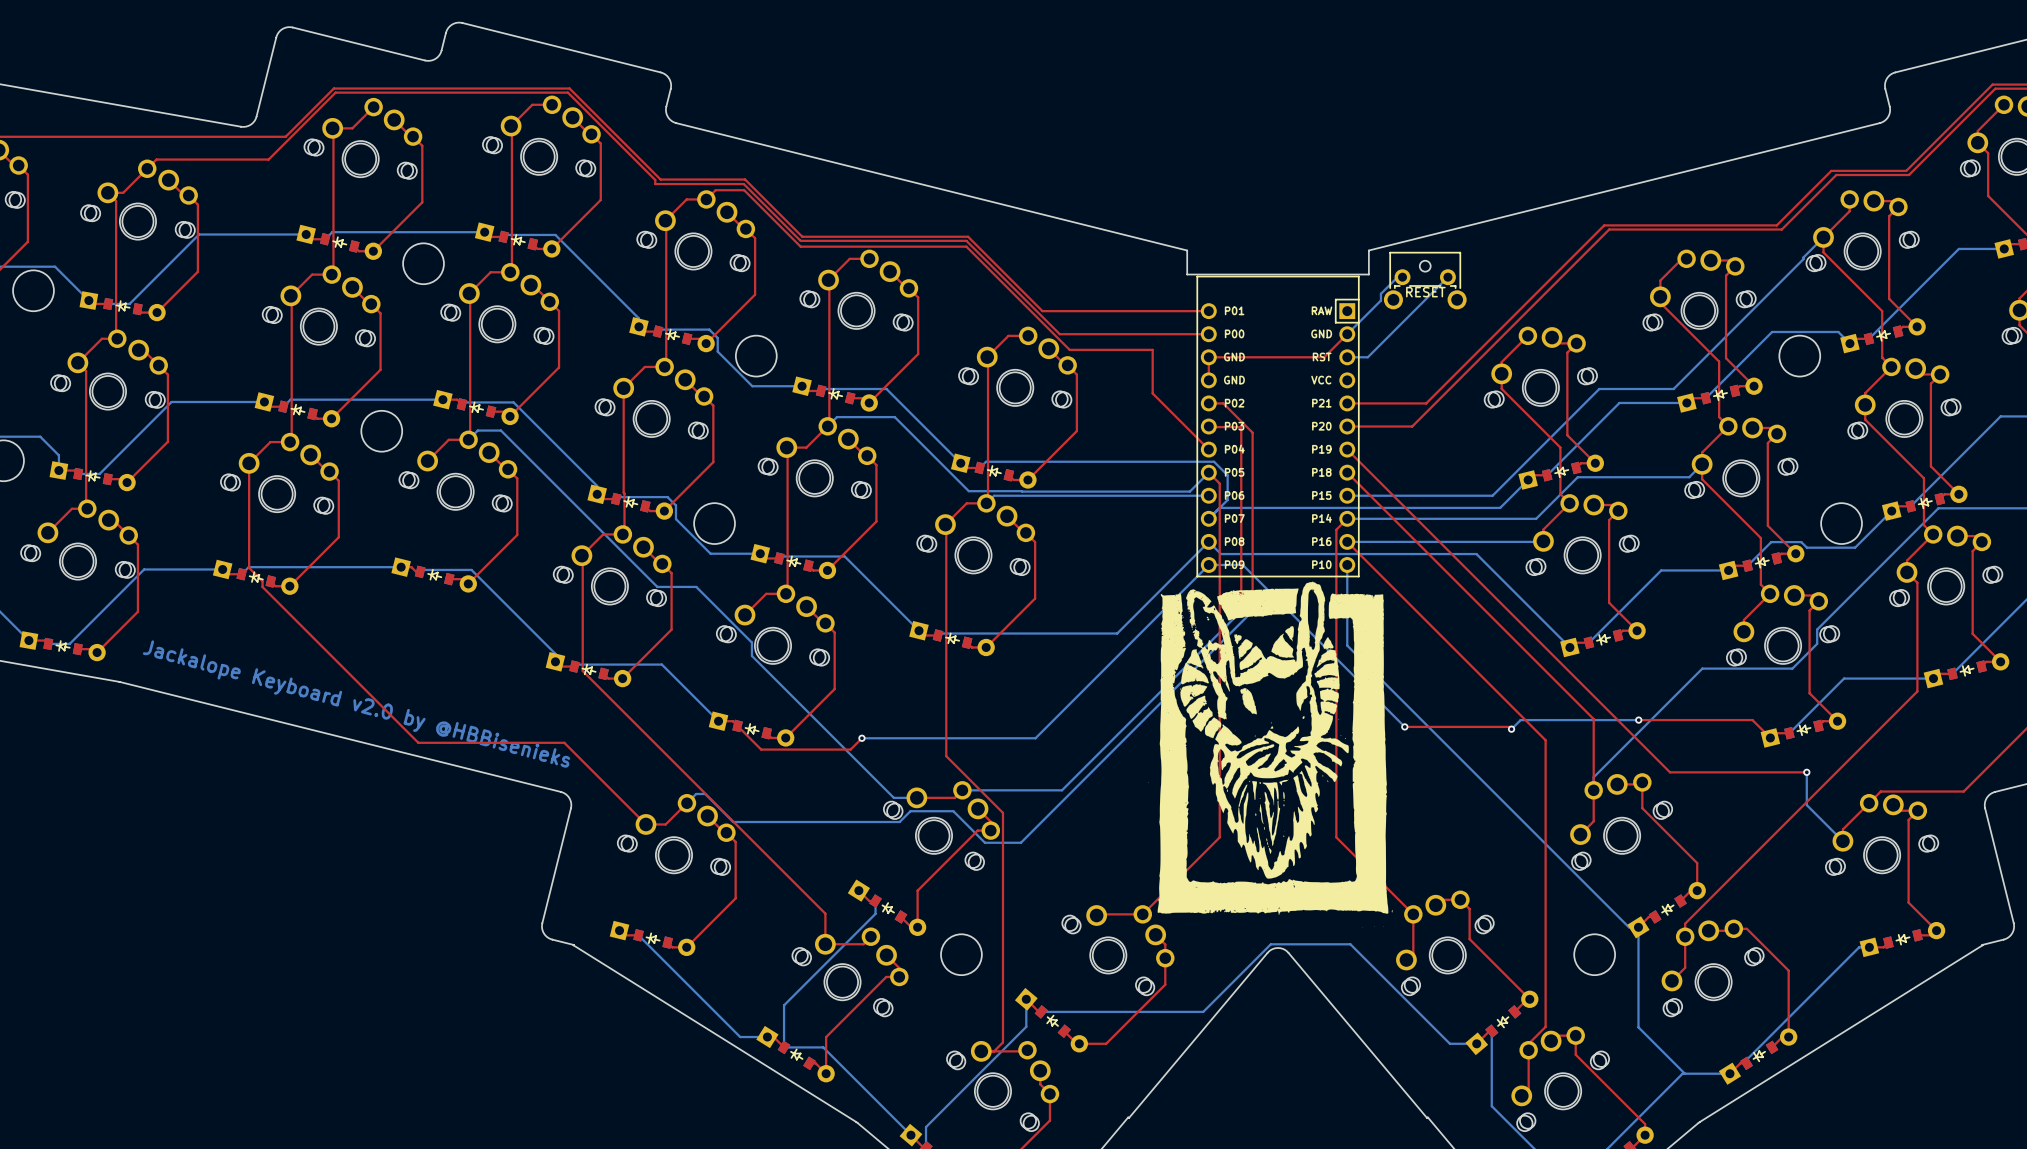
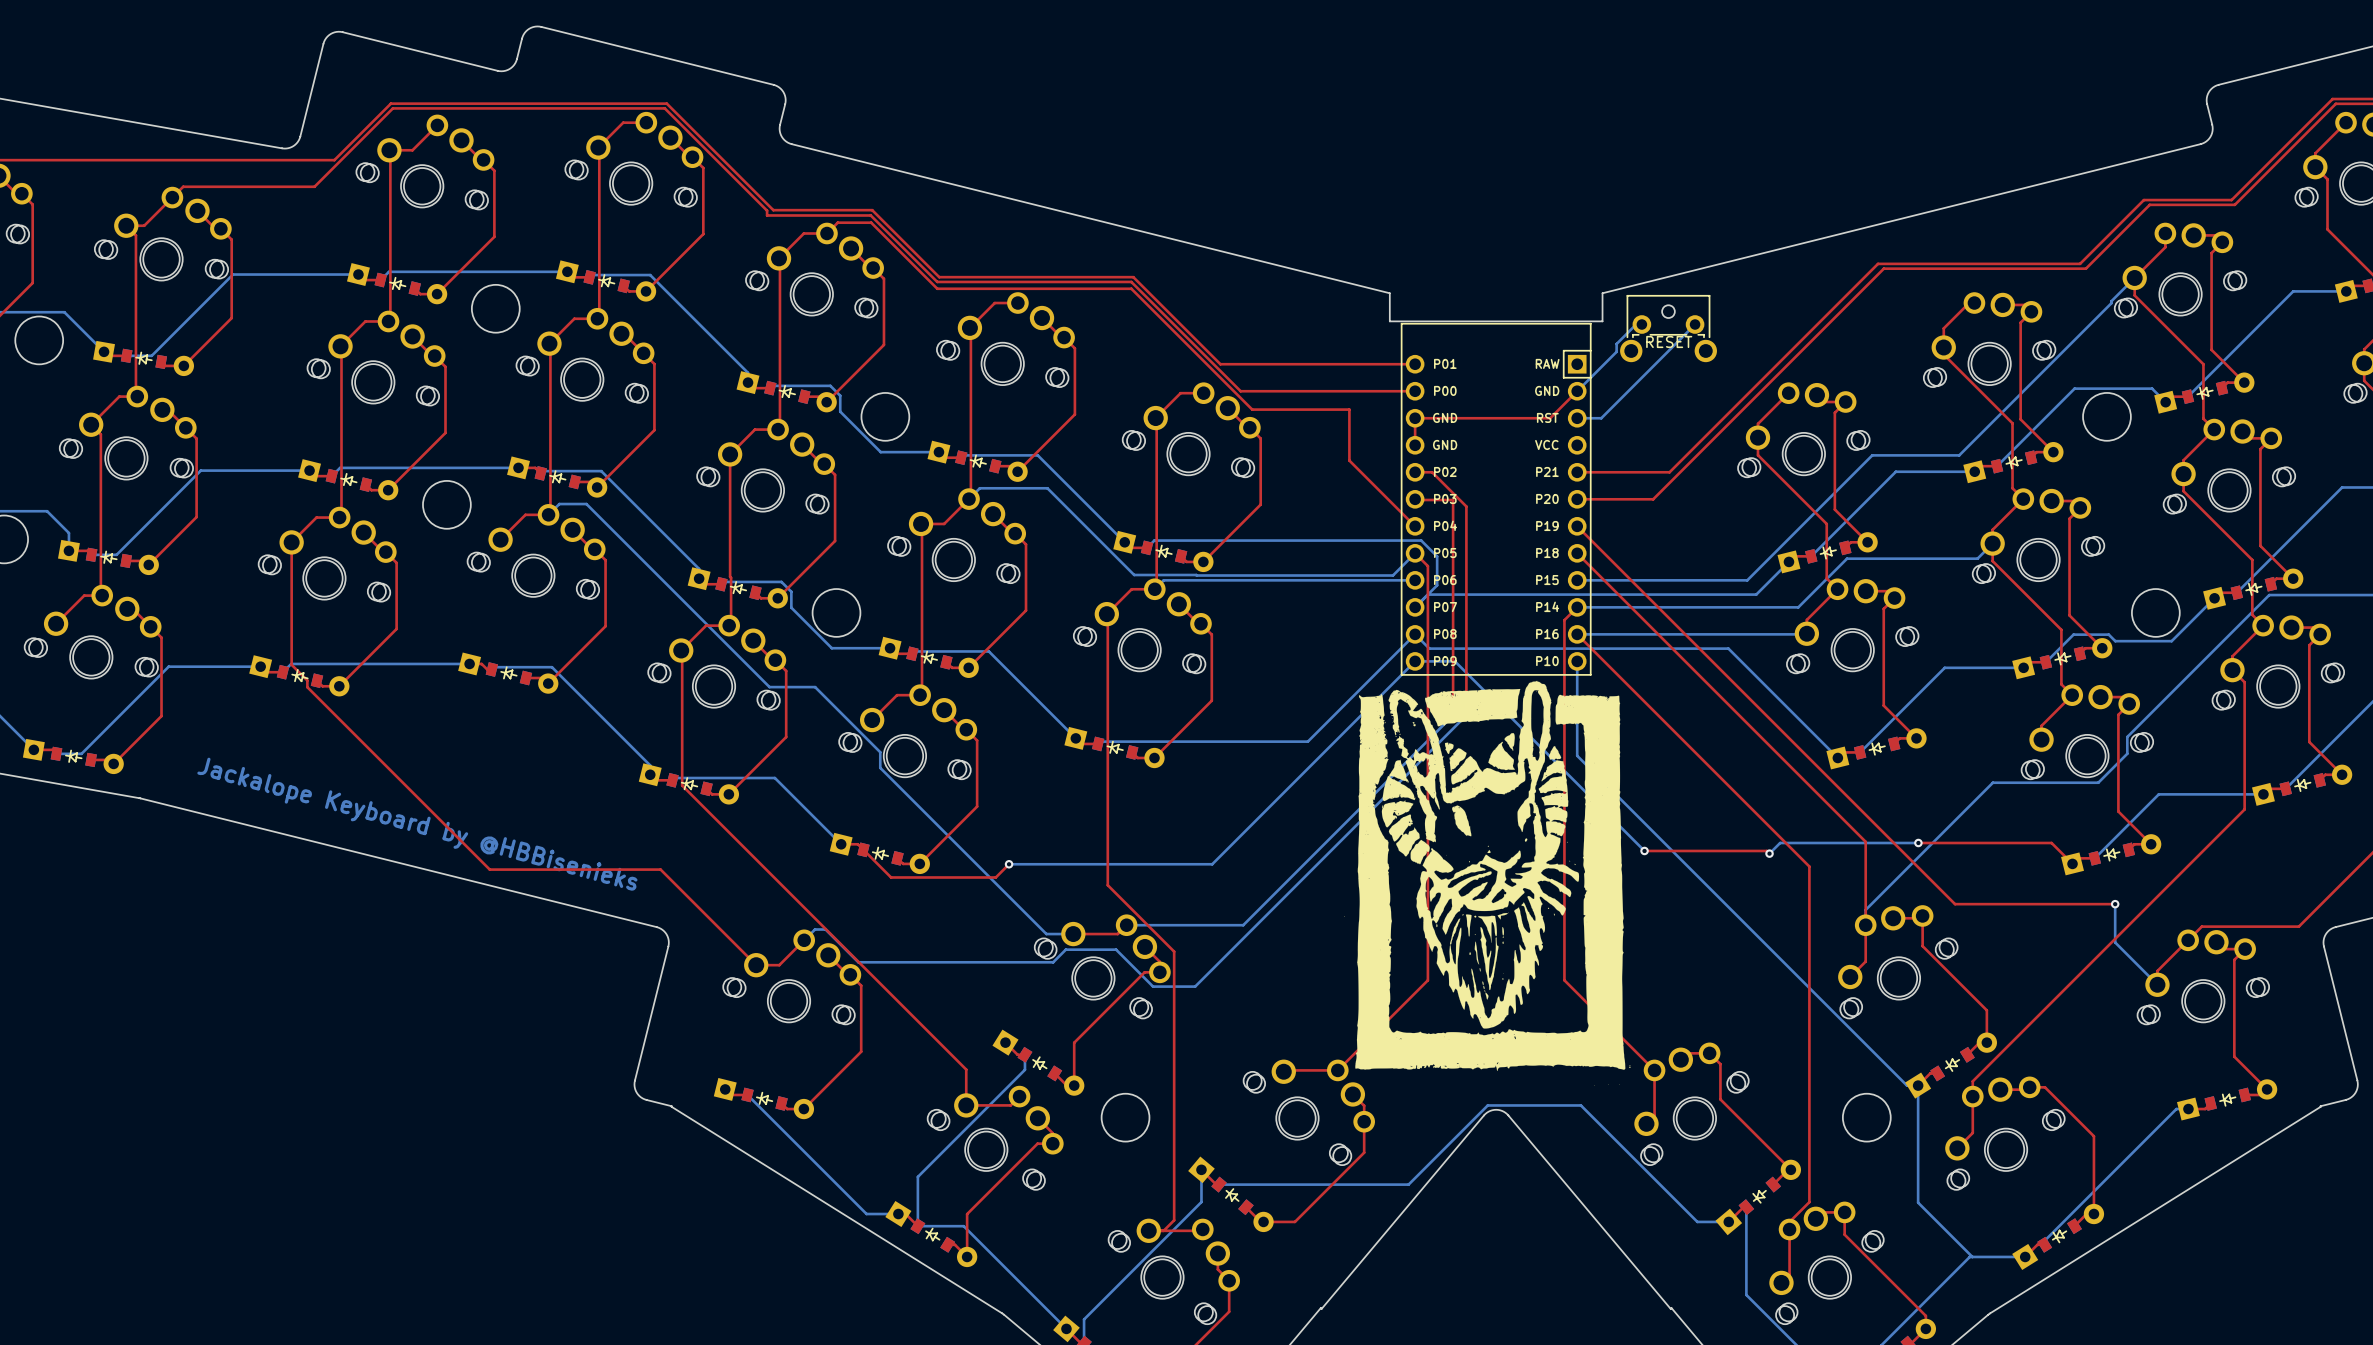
text: Jackalope Keyboard v2.0 by @HBBisenieks (356, 704) -> Jackalope Keyboard by @HBBisenieks (417, 824)

